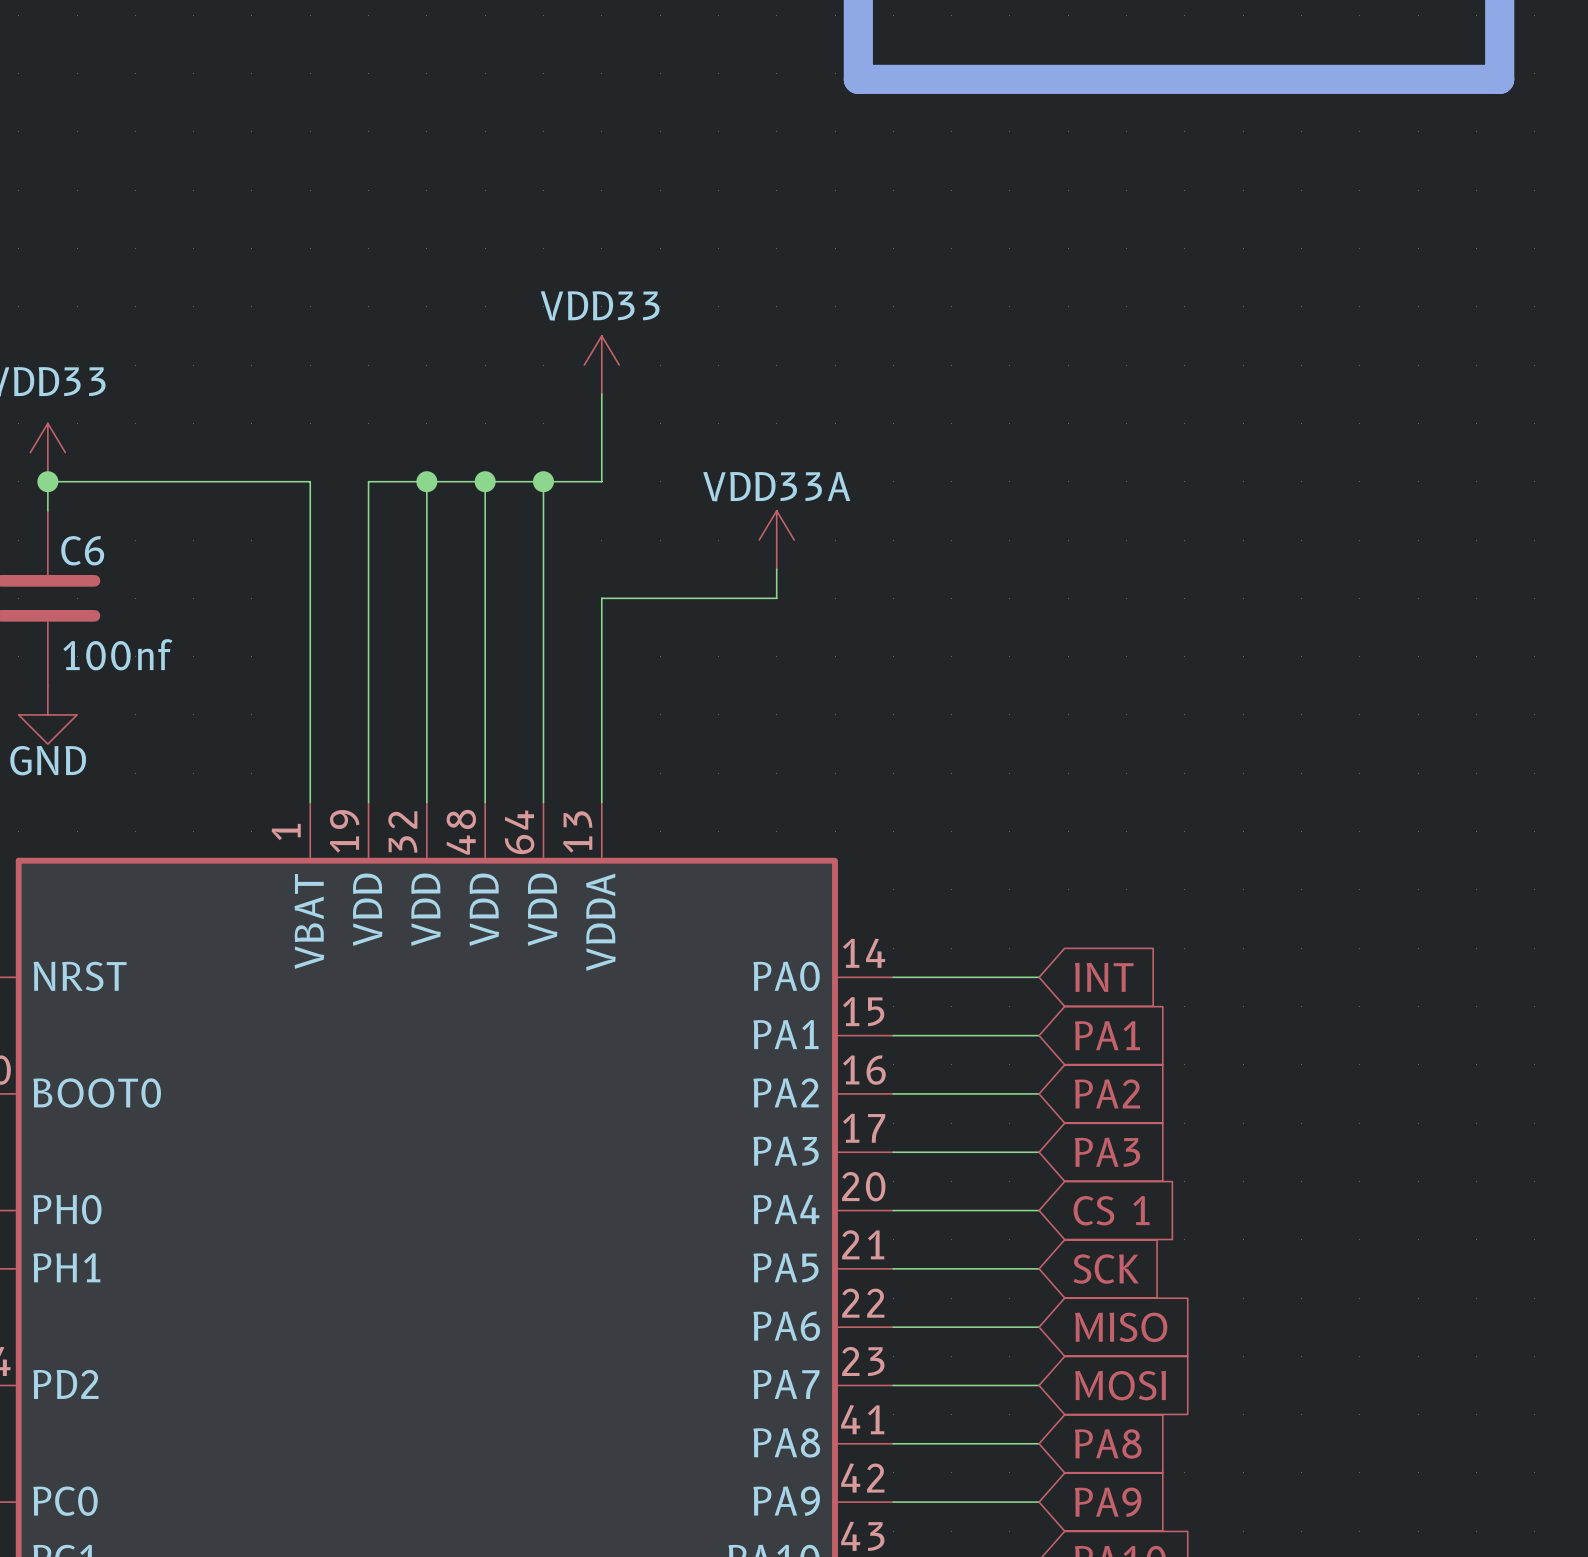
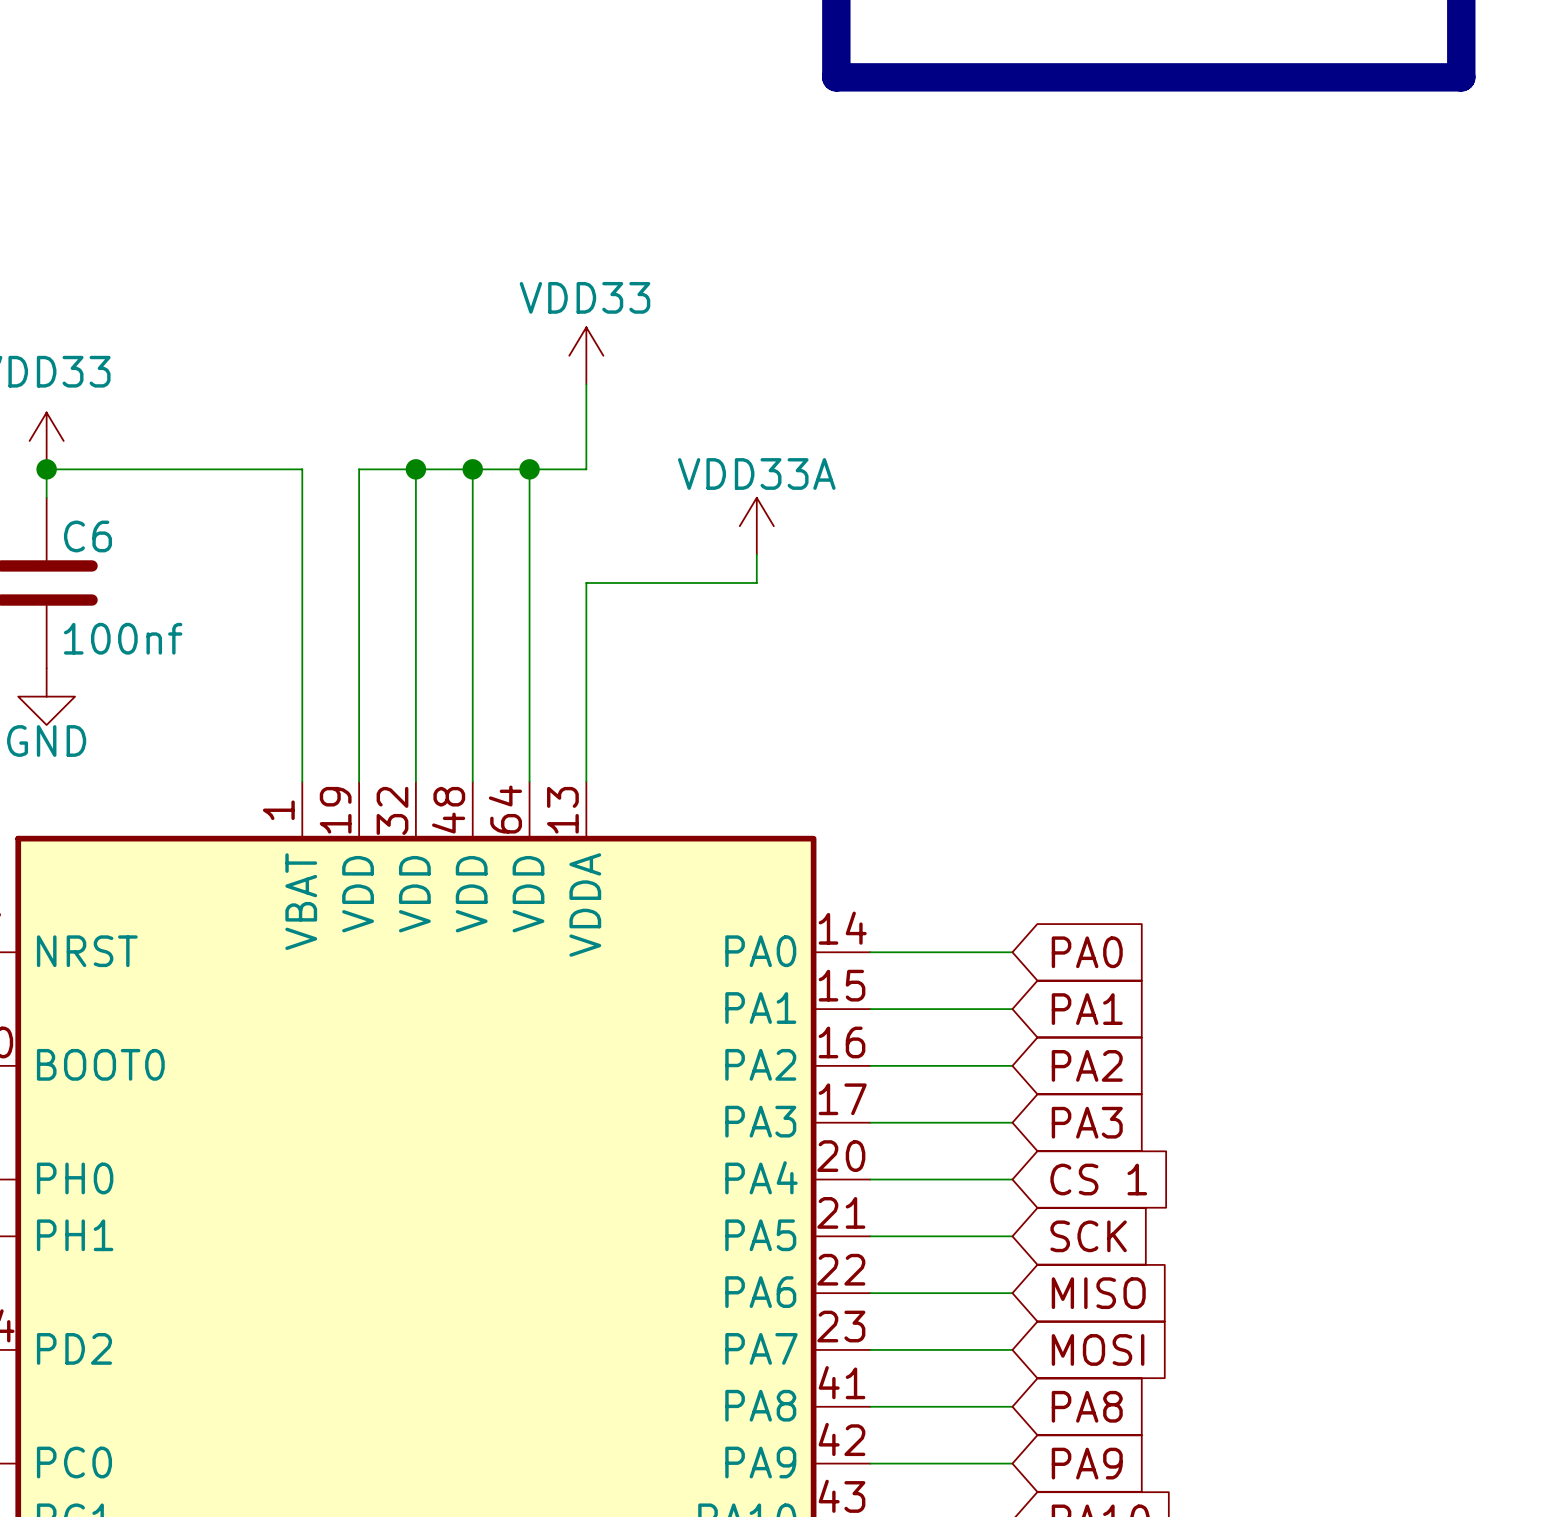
global label: INT (1104, 977) -> PA0 (1087, 952)

